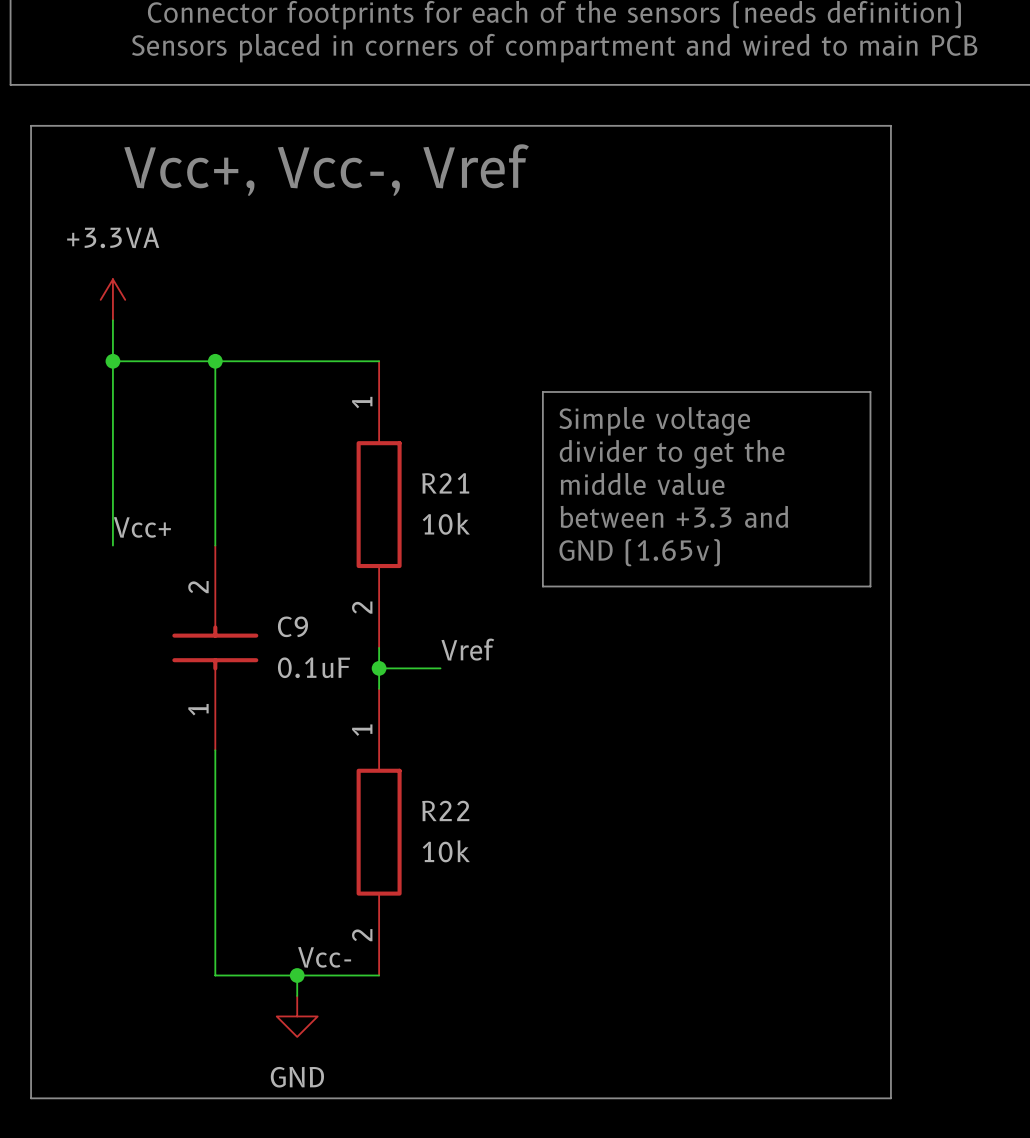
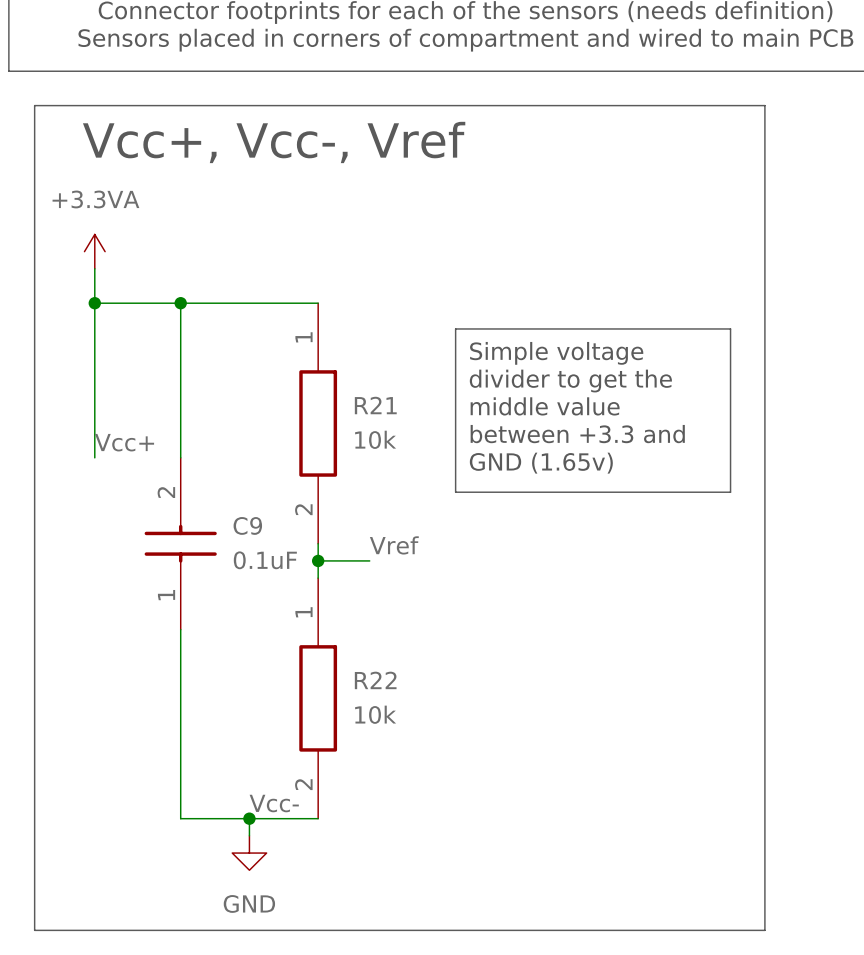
line: (41, 125) (31, 125) (31, 1098) (890, 1098) (890, 125) -> (34, 105) (34, 930) (764, 930) (764, 105) (747, 105)

